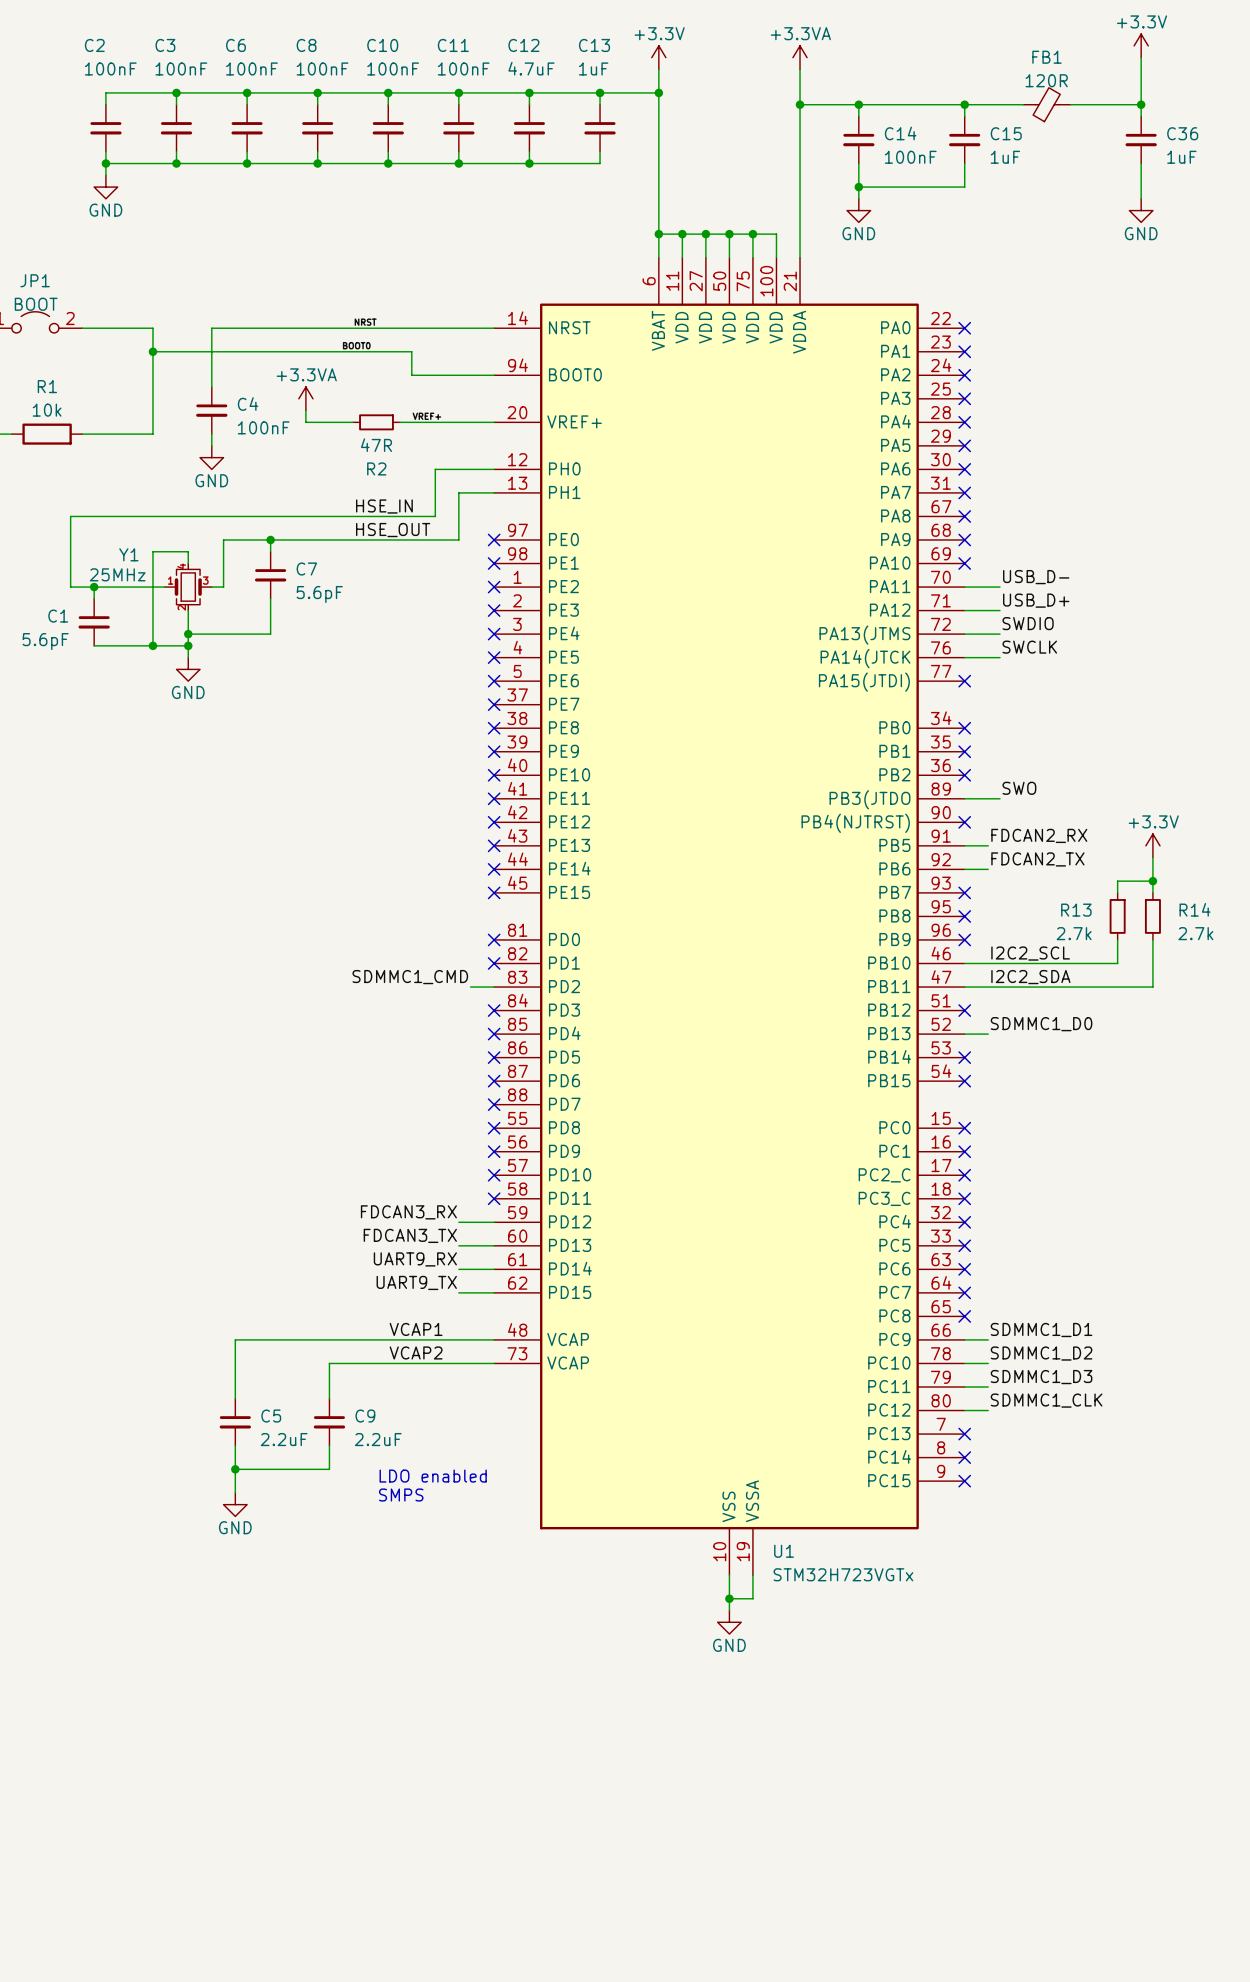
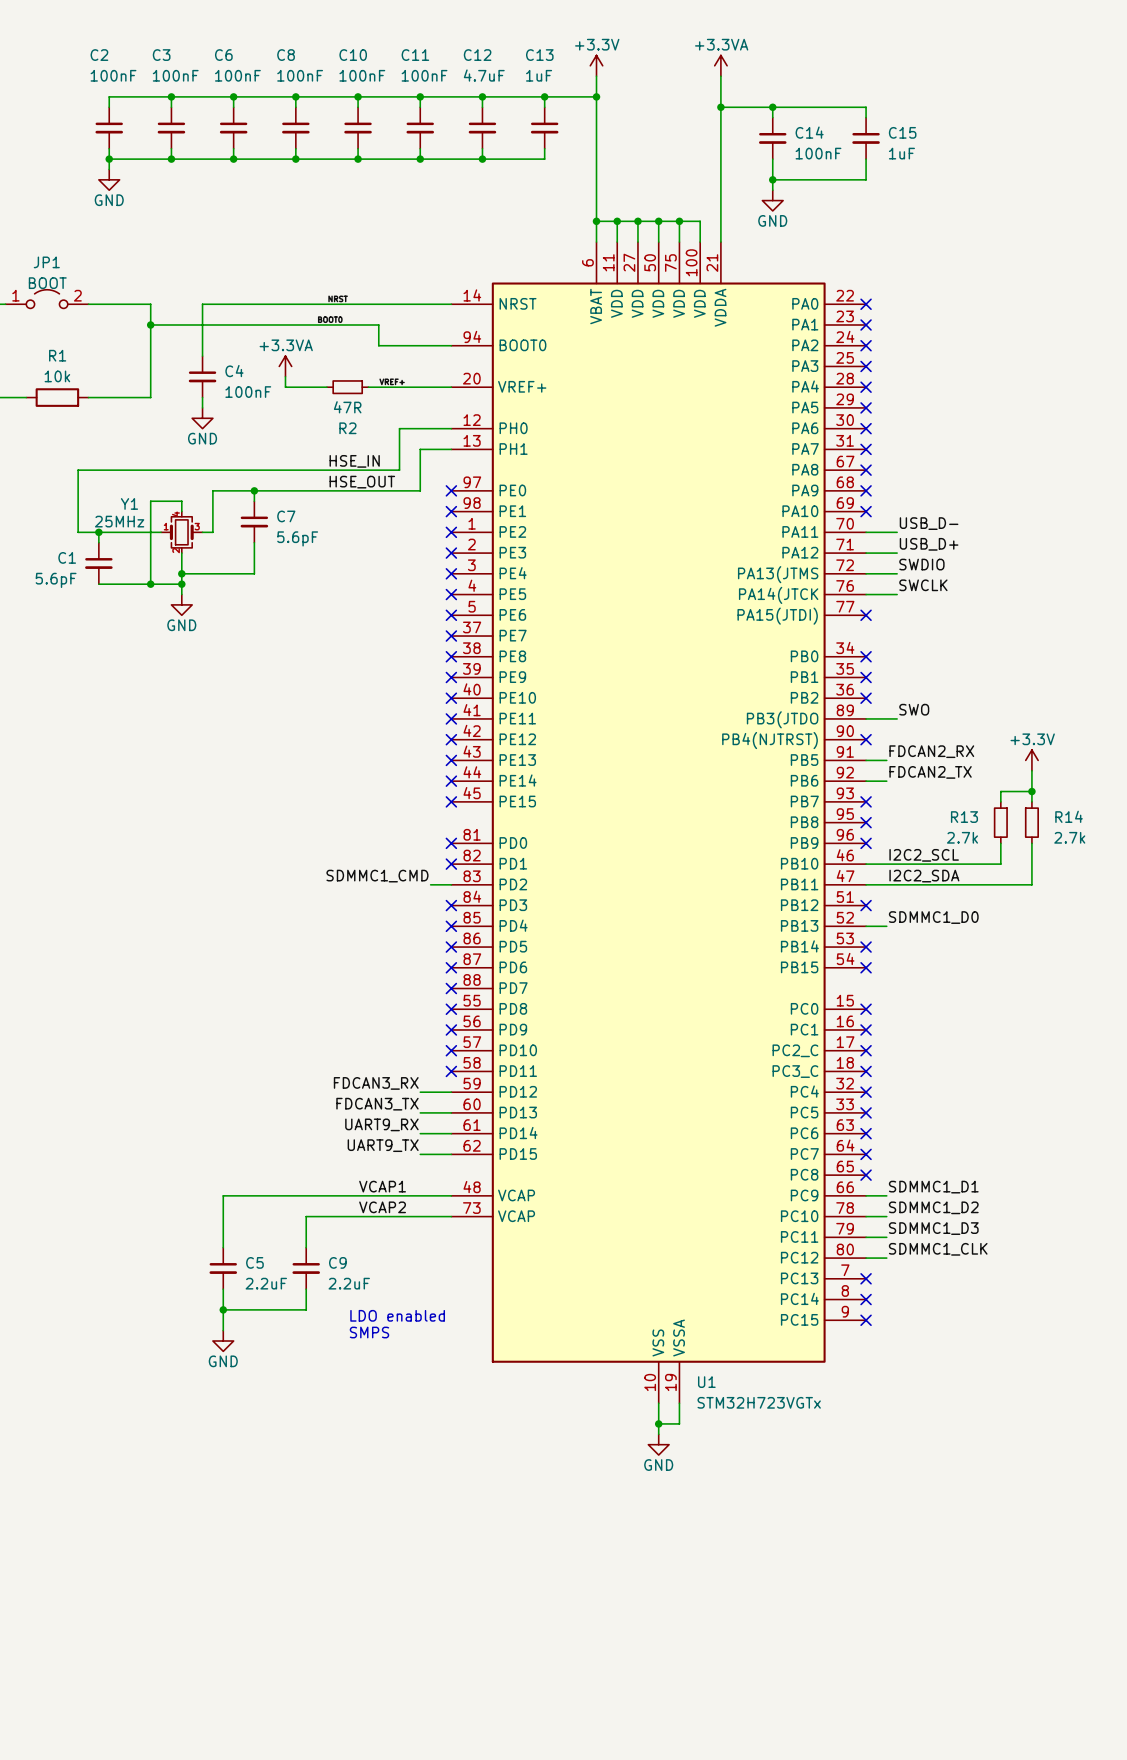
power symbol: +3.3V (1141, 45) -> none
wire: (1141, 57) (1141, 116) -> none
wire: (964, 104) (1023, 104) -> none
junction: (964, 104) -> none
FB1: 120R (1047, 104) -> none
wire: (1070, 104) (1141, 104) -> none
junction: (1141, 104) -> none
C36: 1uF (1141, 140) -> none
wire: (1141, 163) (1141, 198) -> none
power symbol: GND (1141, 210) -> none

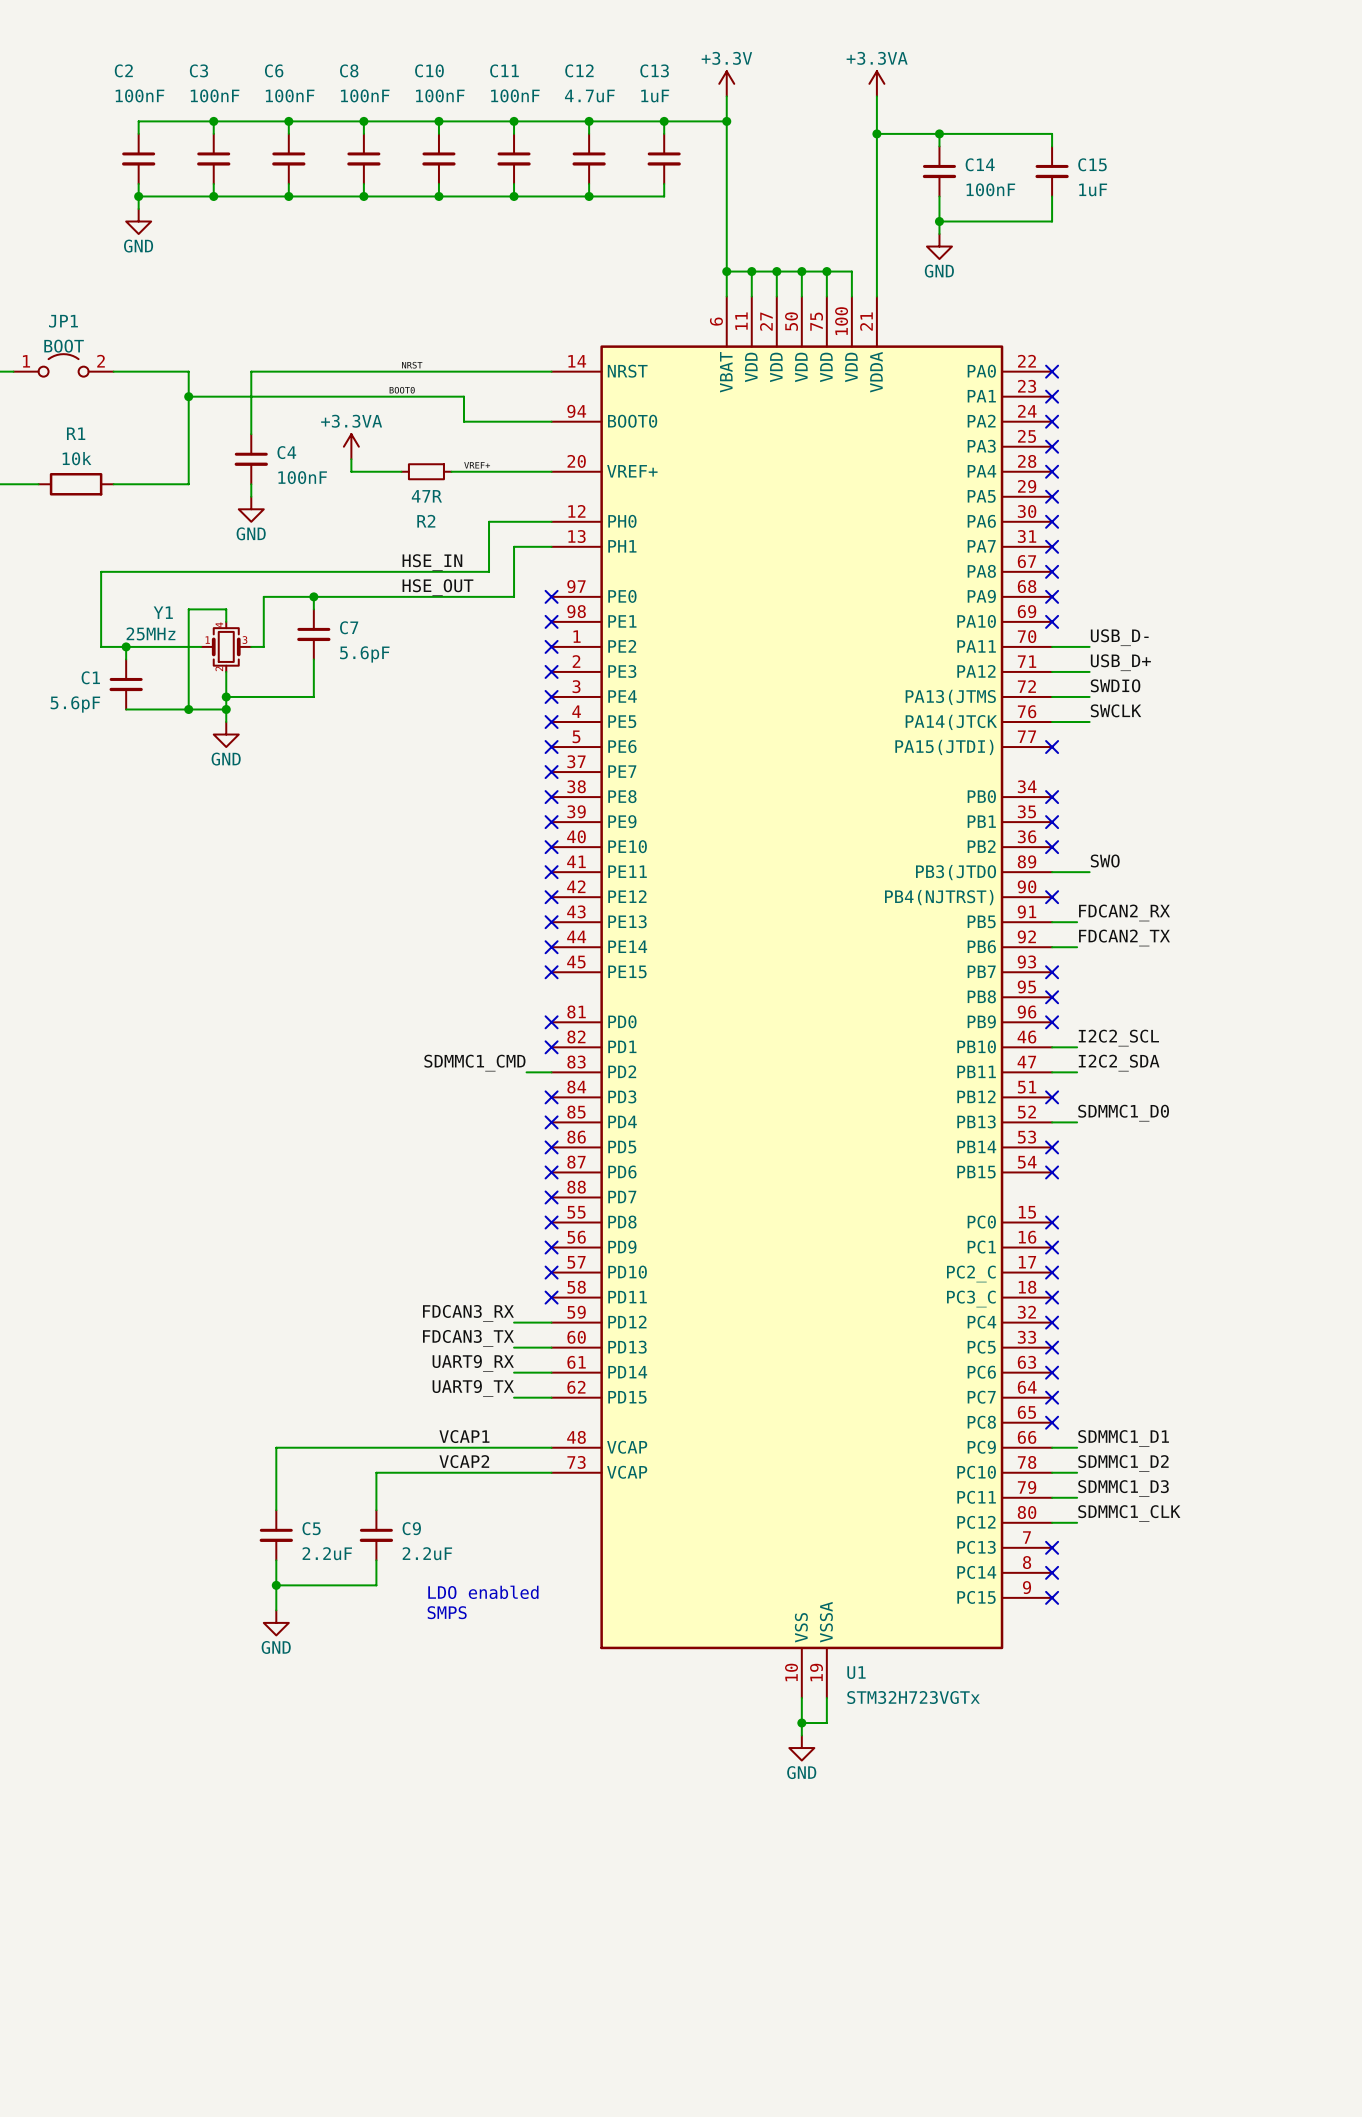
power symbol: +3.3V (1031, 760) -> none
wire: (1031, 770) (1031, 801) -> none
wire: (1031, 791) (1000, 791) (1000, 801) -> none
junction: (1031, 791) -> none
R13: 2.7k (1000, 822) -> none
R14: 2.7k (1031, 822) -> none
wire: (1000, 843) (1000, 864) (886, 864) -> none
wire: (1031, 843) (1031, 884) (886, 884) -> none

